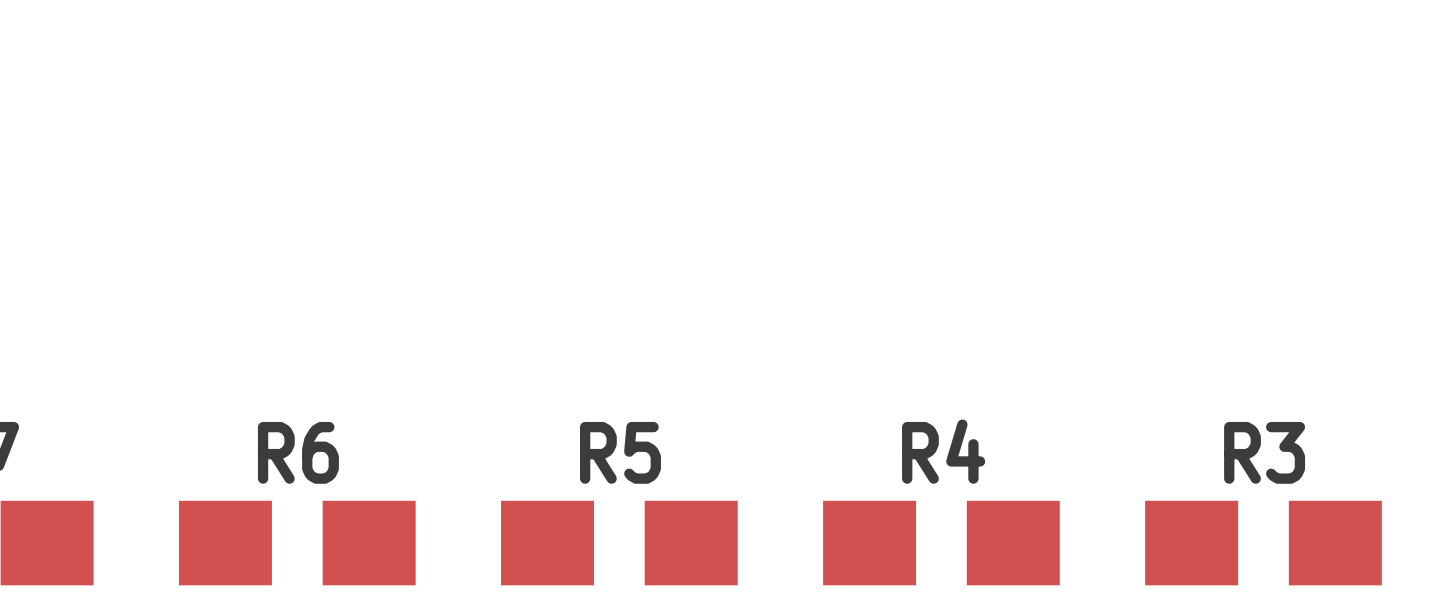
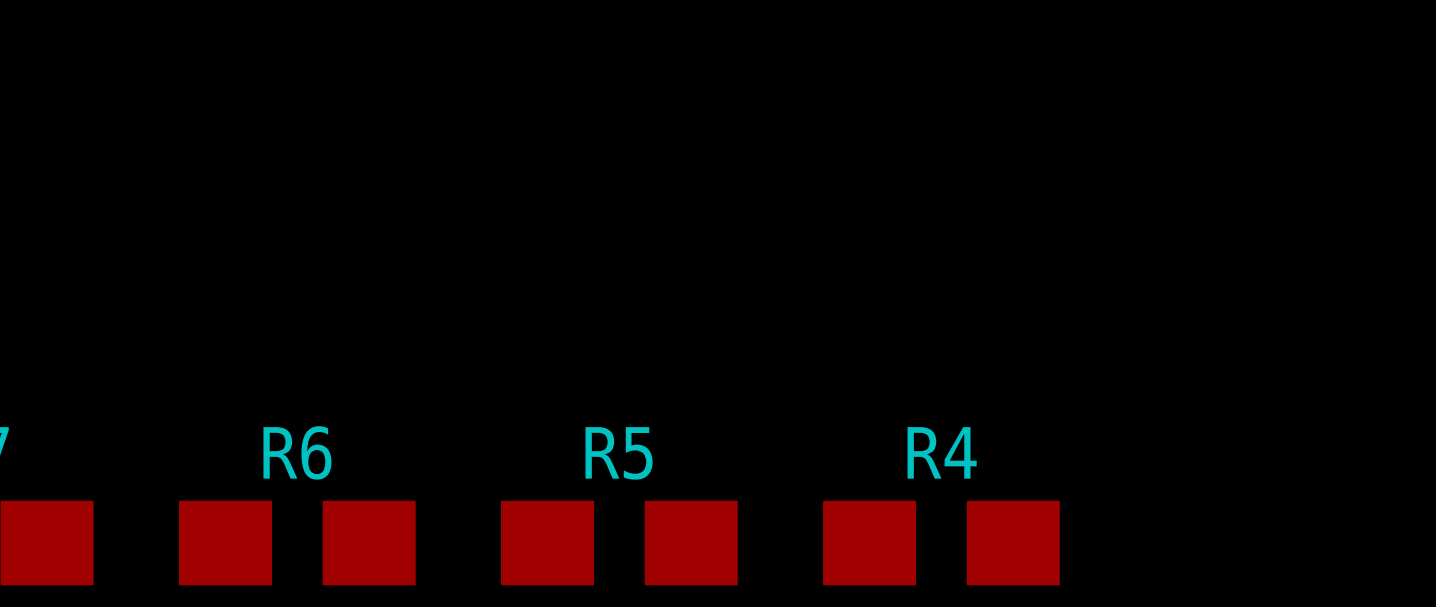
R3: (1263, 543) -> none

